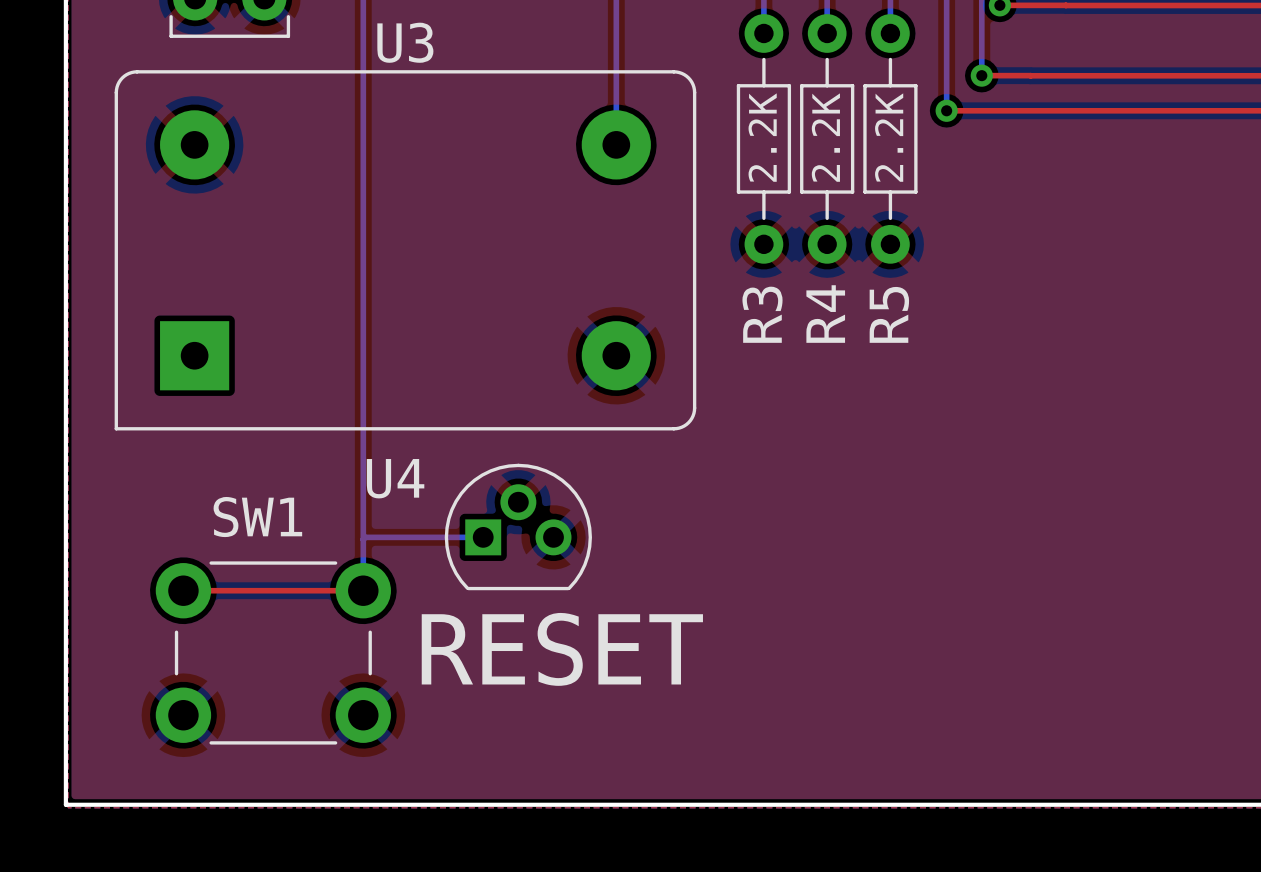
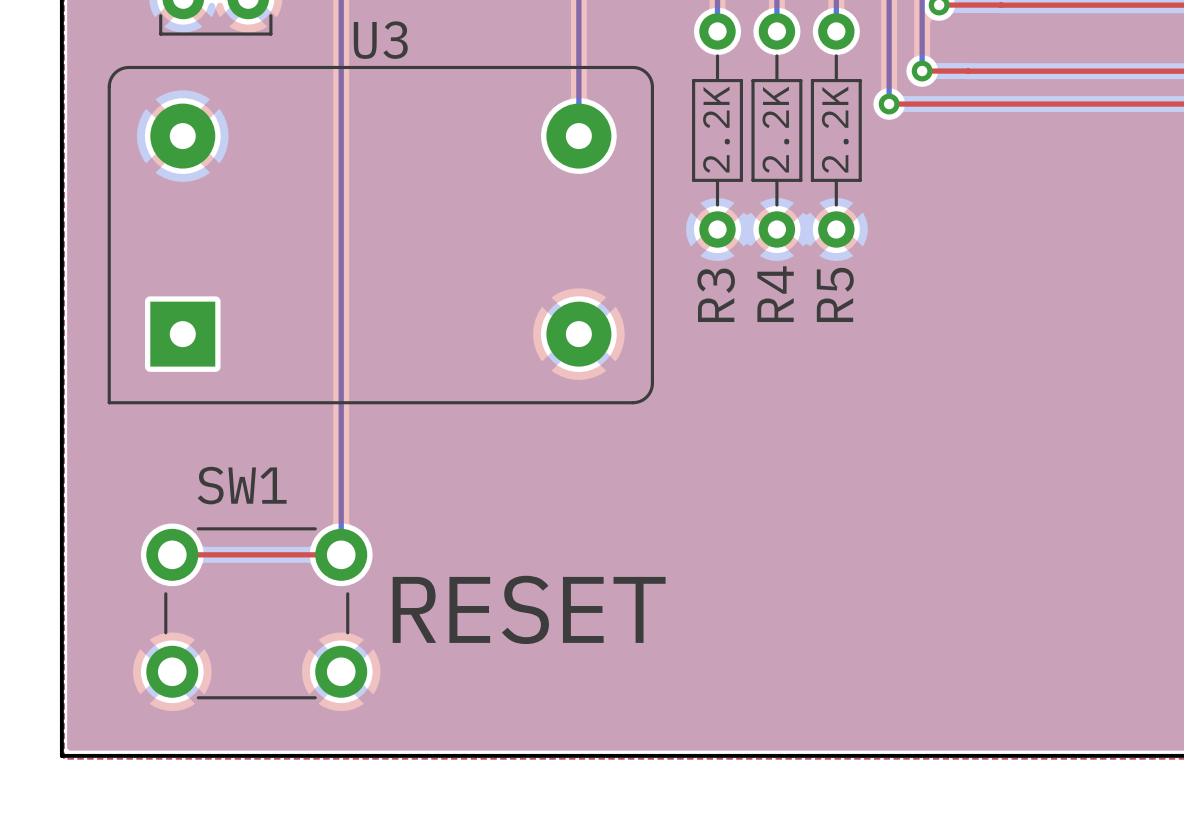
U4: (518, 526) -> none
bottom track: (483, 537) (365, 537) (363, 539) -> none

